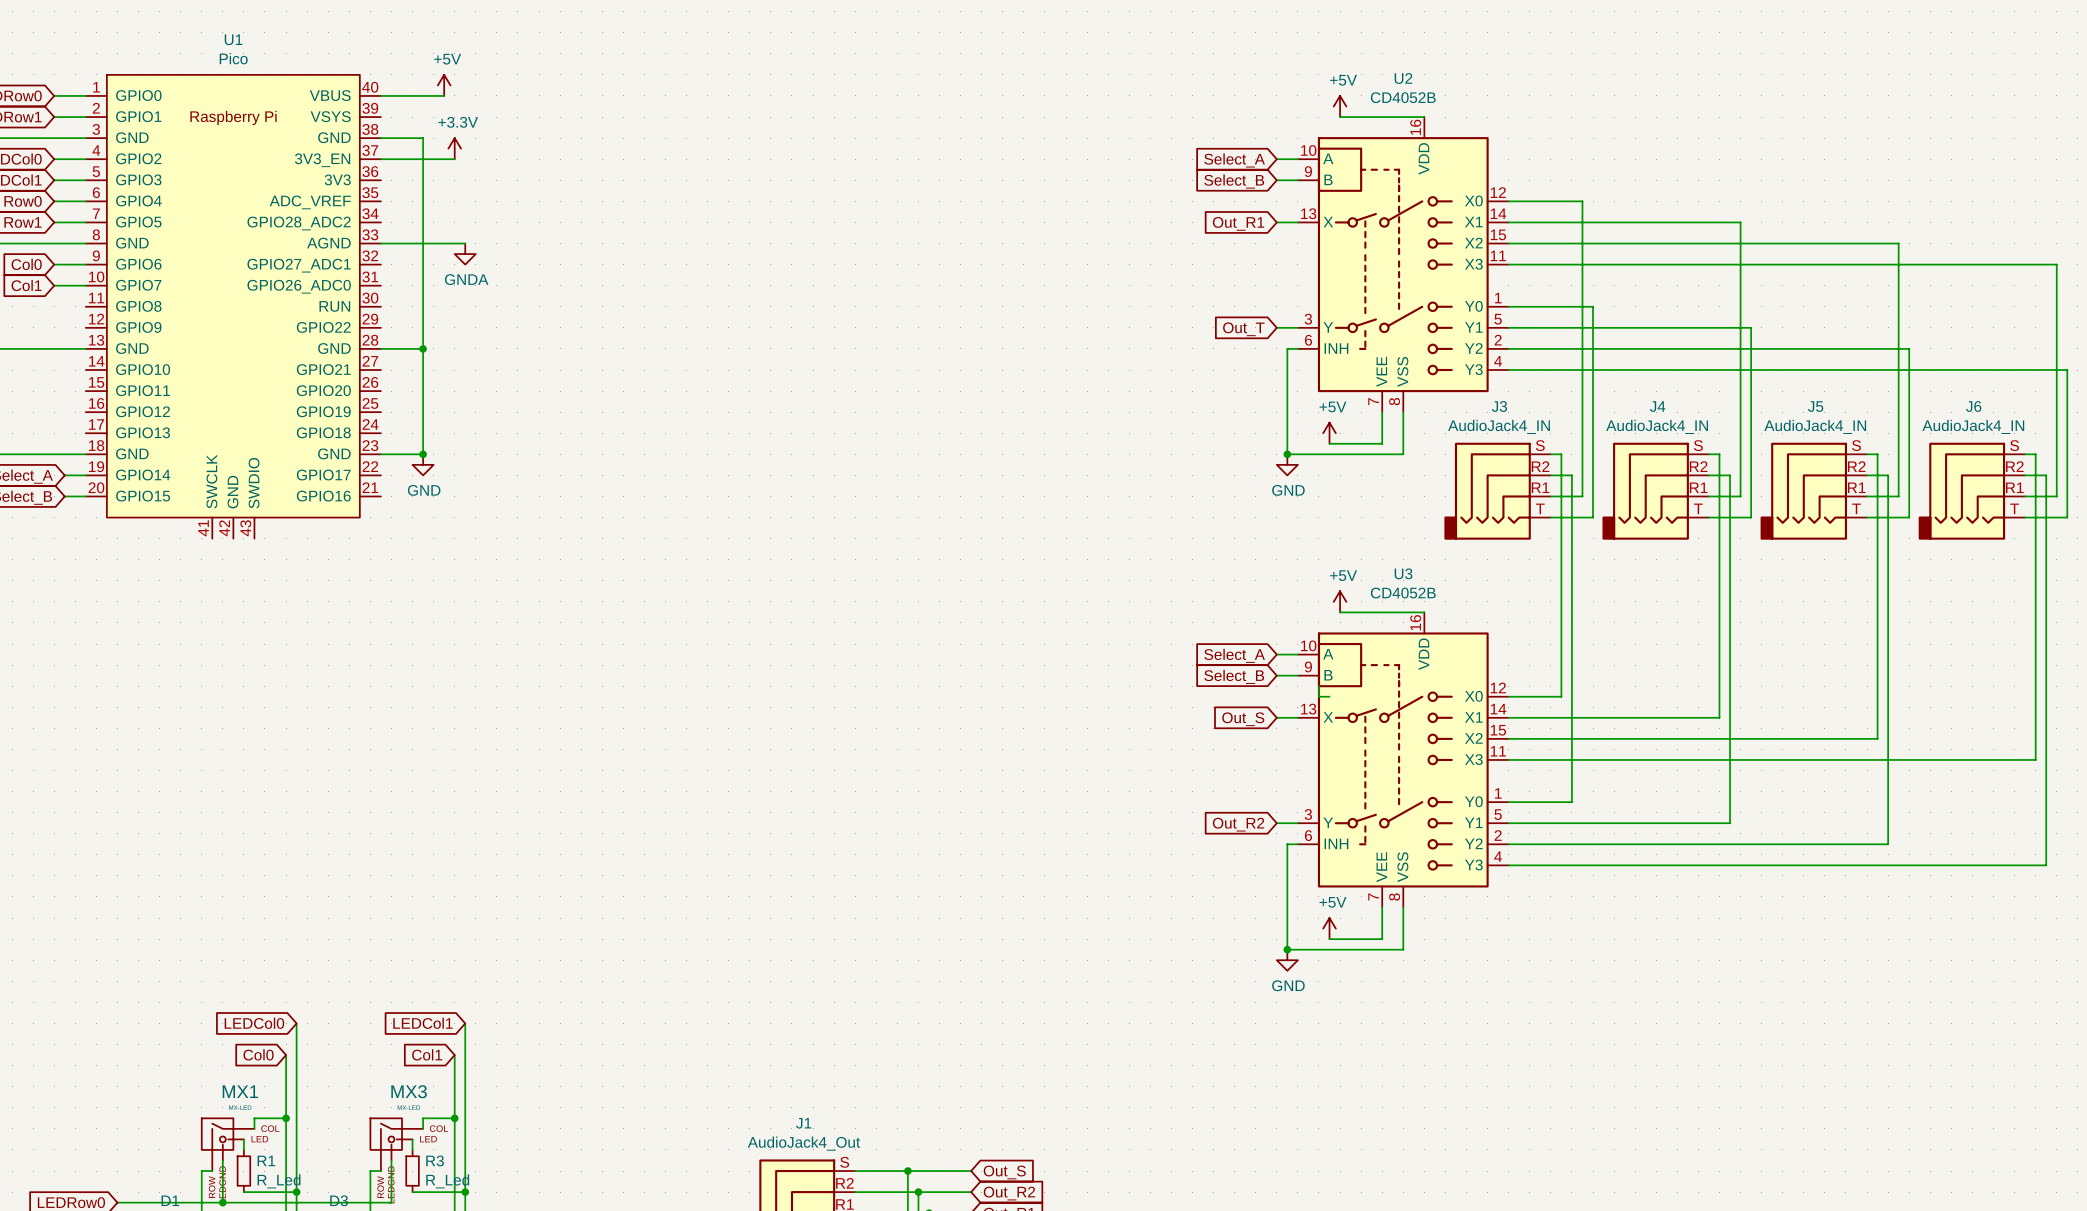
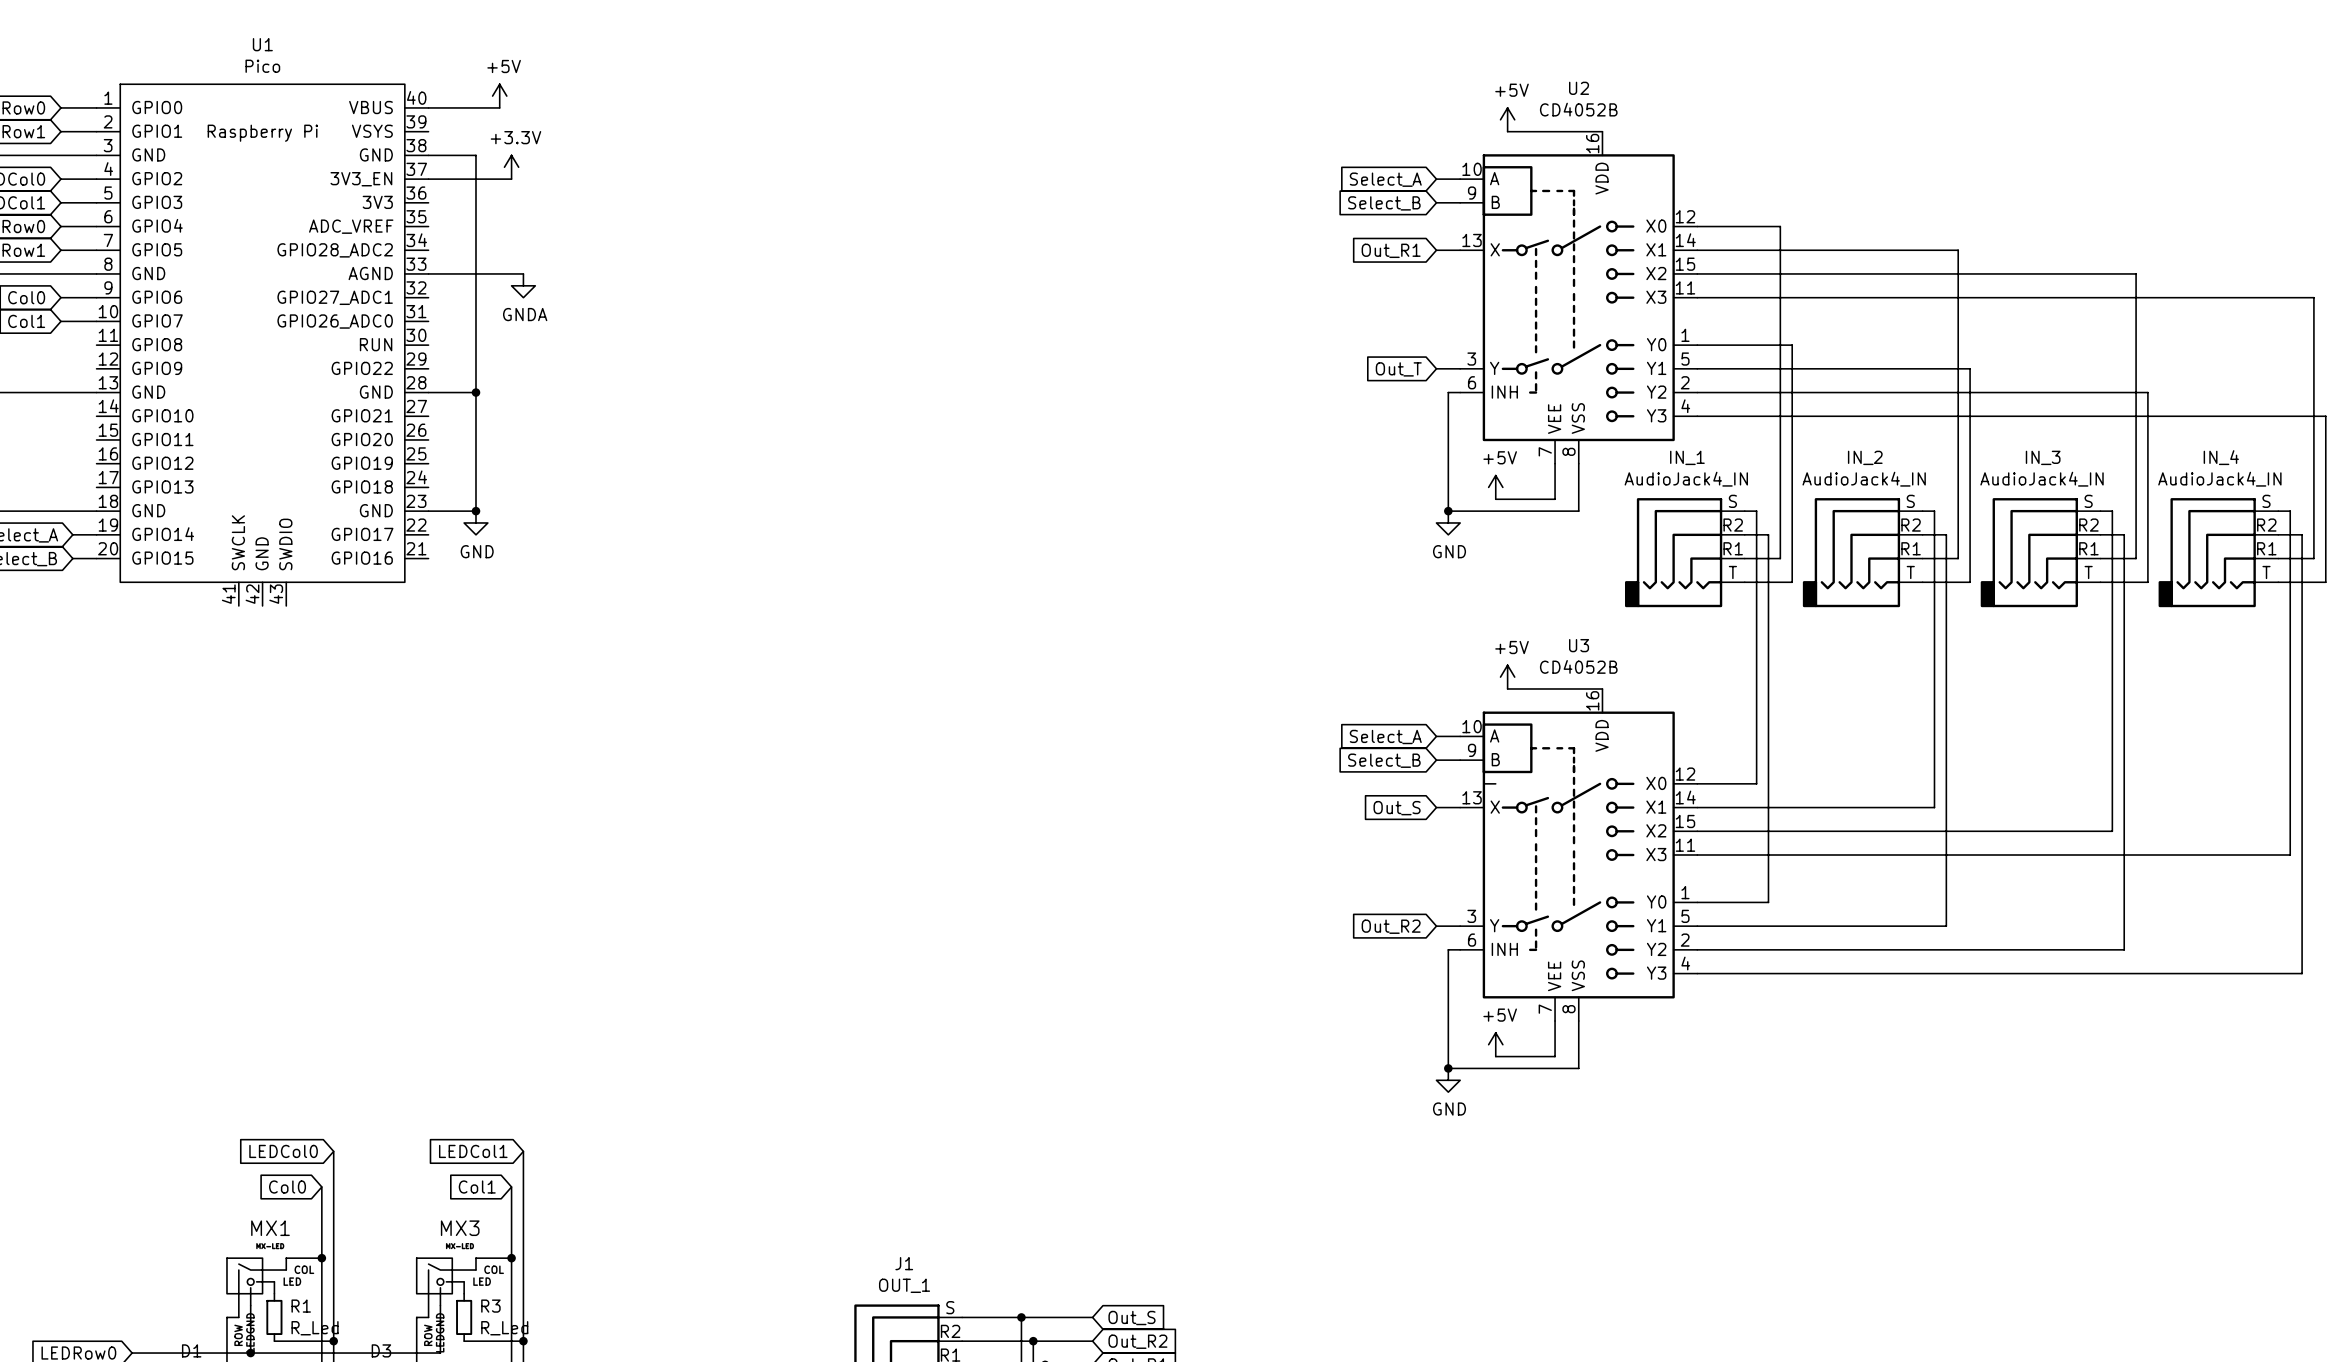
J3 name: J3 (1499, 406) -> IN_1 (1687, 457)
J4 name: J4 (1657, 406) -> IN_2 (1865, 457)
J5 name: J5 (1815, 406) -> IN_3 (2043, 457)
J6 name: J6 (1973, 406) -> IN_4 (2221, 457)
J1 value: AudioJack4_Out (803, 1143) -> OUT_1 (904, 1285)

